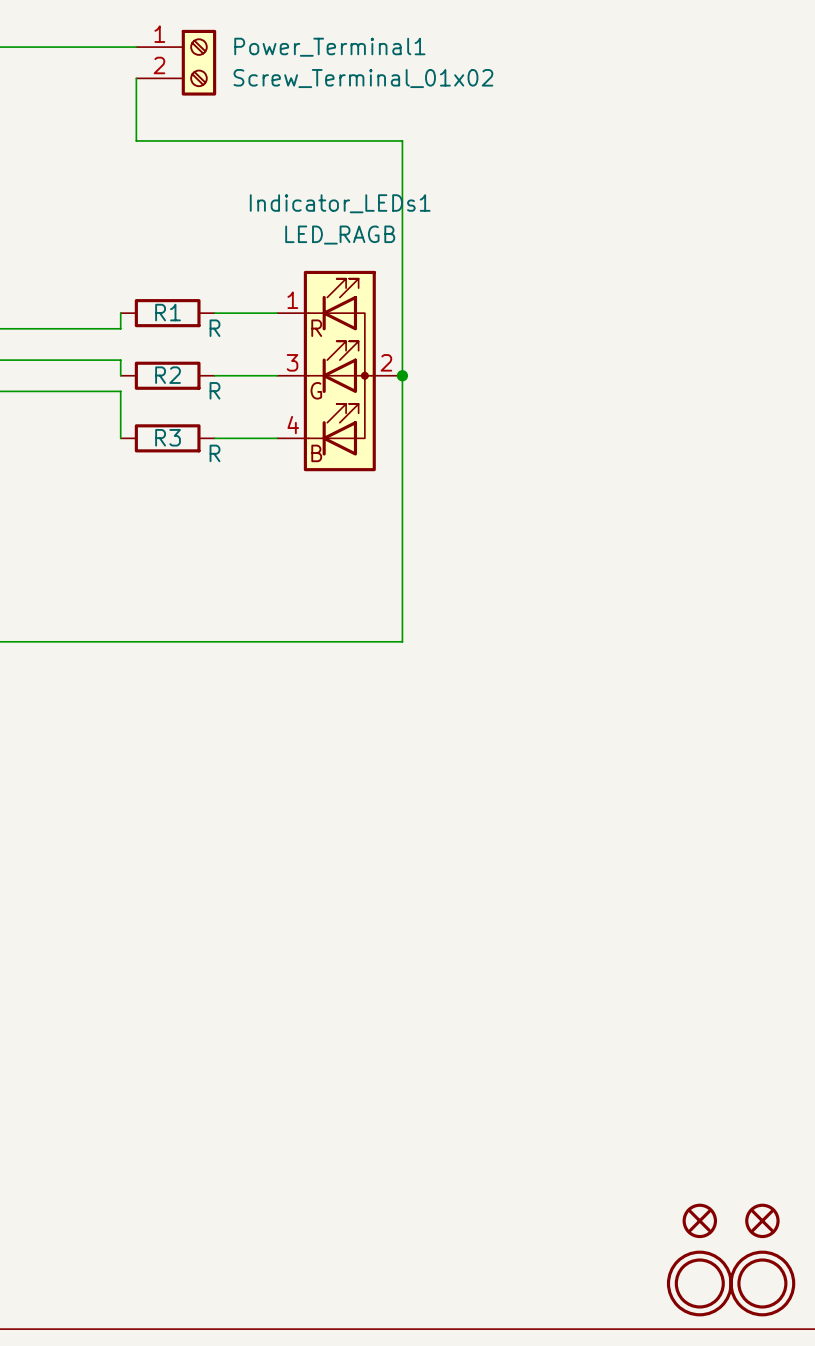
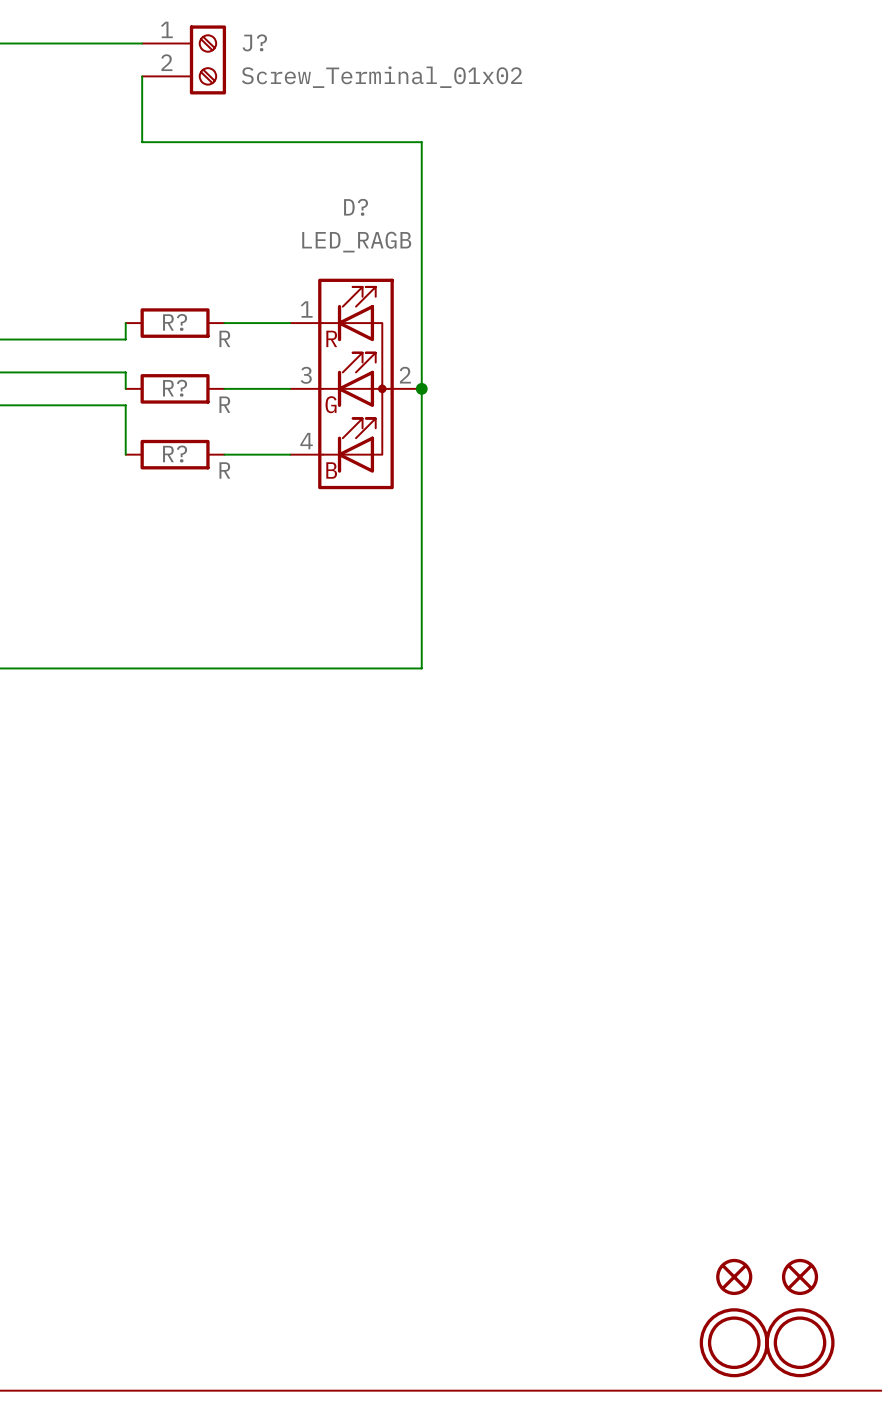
Power_Terminal1 name: Power_Terminal1 (329, 47) -> J? (254, 42)
Indicator_LEDs1 name: Indicator_LEDs1 (340, 203) -> D? (356, 207)
R1 name: R1 (168, 312) -> R? (175, 322)
R2 name: R2 (168, 375) -> R? (175, 388)
R3 name: R3 (168, 437) -> R? (175, 454)

